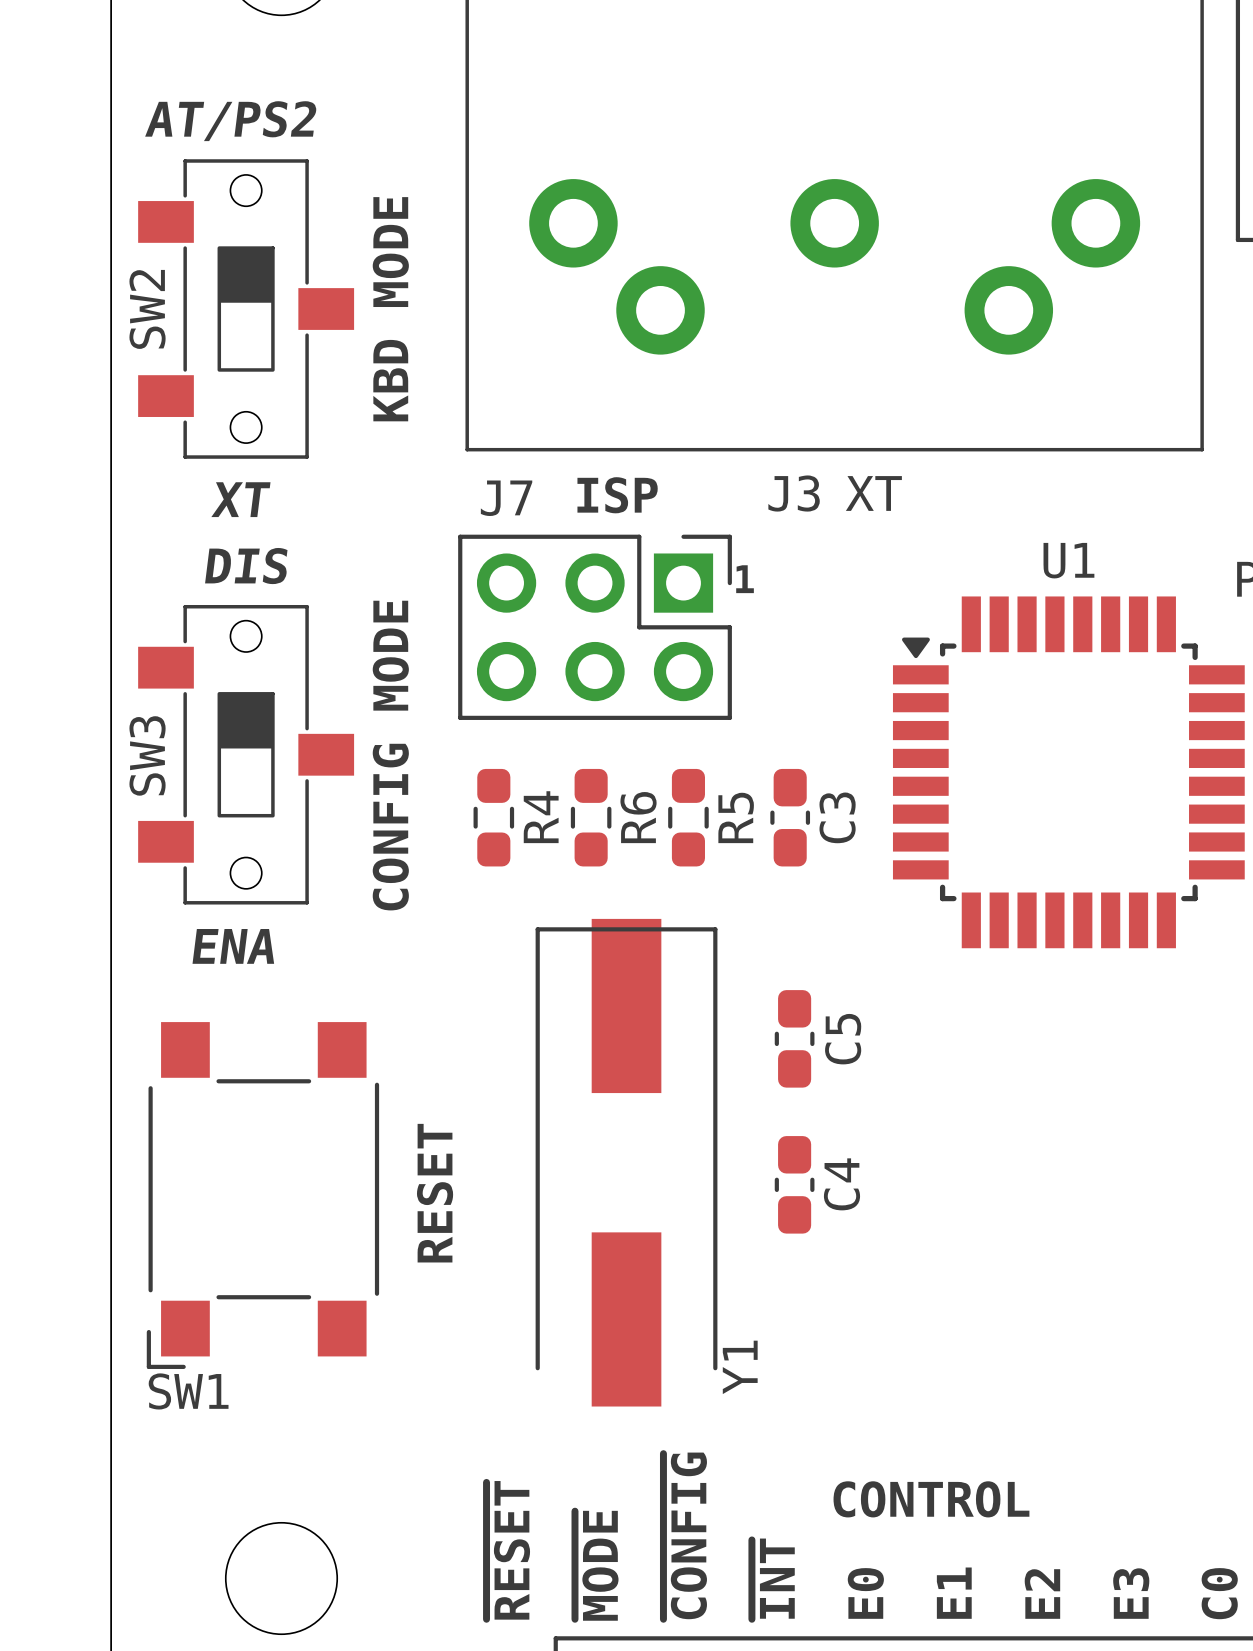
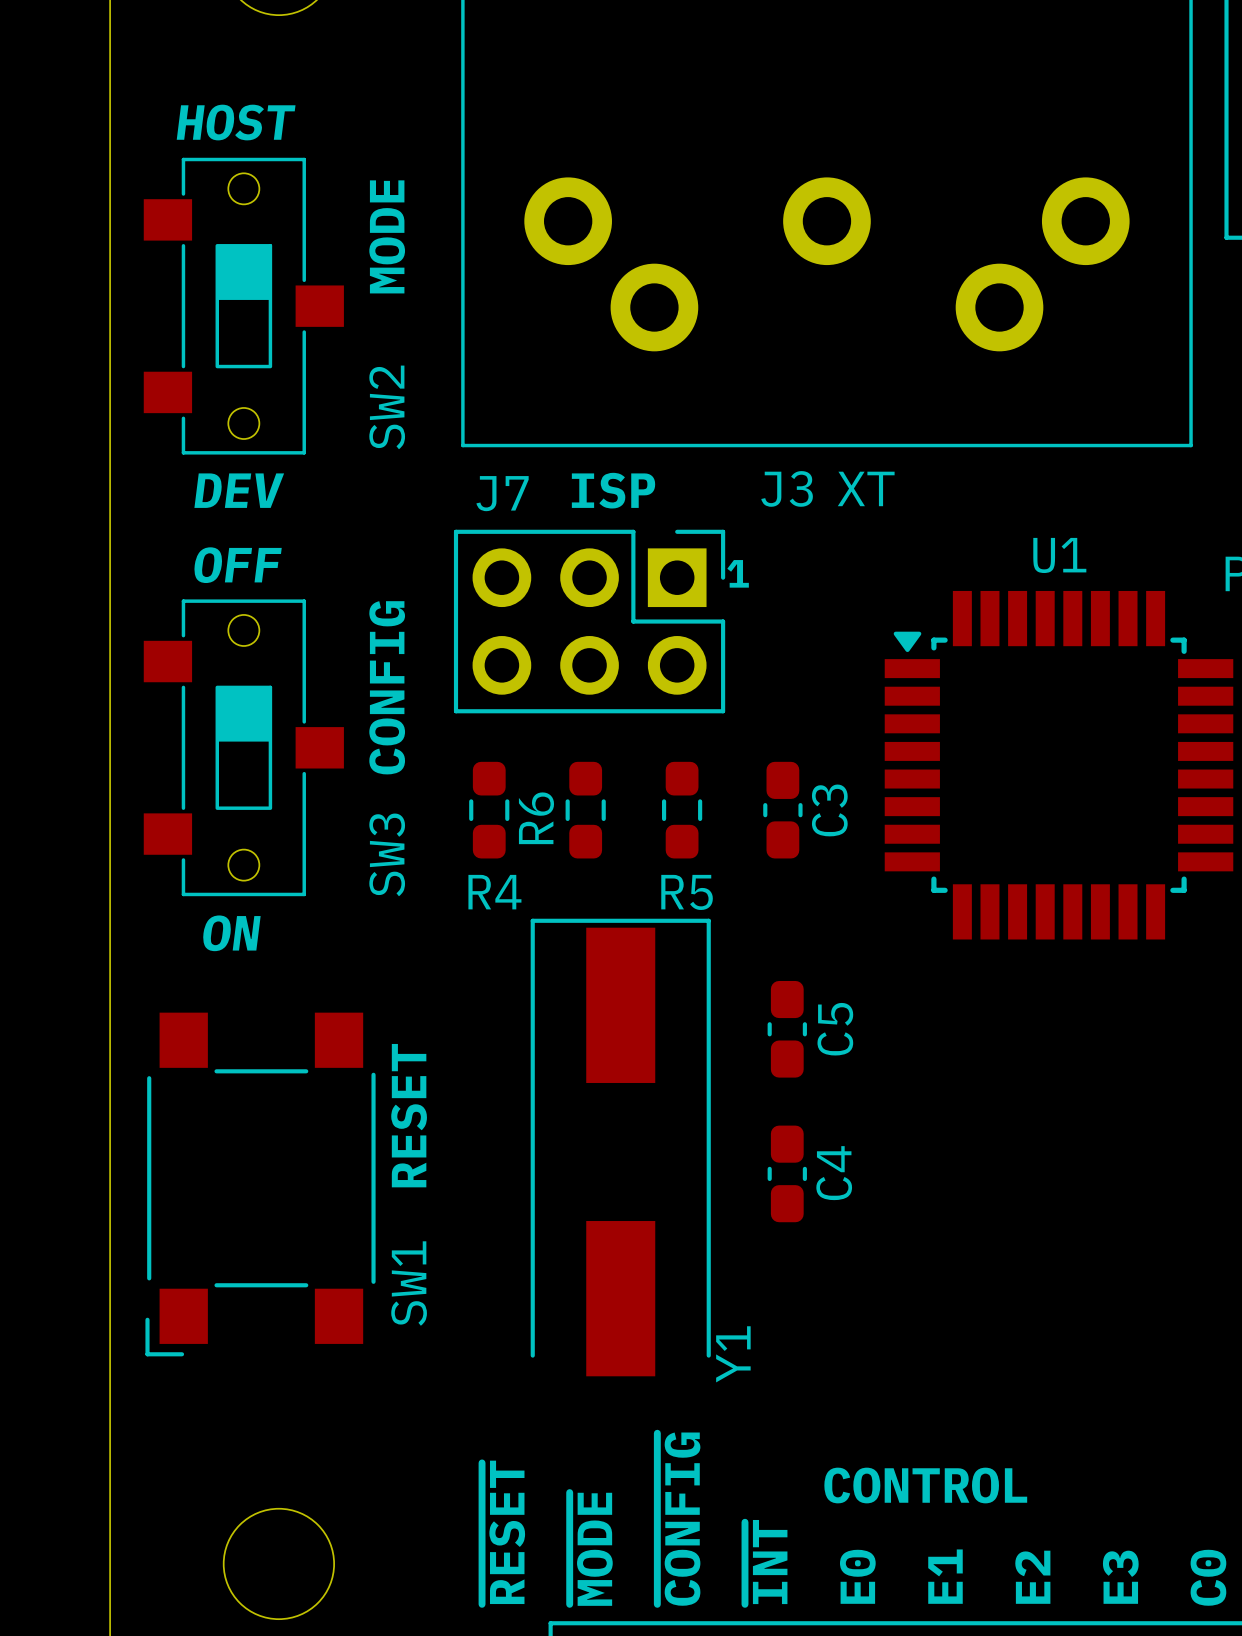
text: AT/PS2 (230, 121) -> HOST (236, 122)
SW2 footprint: [138, 159, 355, 459] -> [143, 157, 344, 455]
SW2 name position: SW2 (147, 309) -> SW2 (387, 407)
SW2 value: KBD MODE (390, 309) -> MODE (387, 236)
text: XT (240, 499) -> DEV (239, 490)
text: DIS (246, 566) -> OFF (237, 565)
SW3 footprint: [138, 604, 355, 905] -> [143, 599, 344, 897]
SW3 name position: SW3 (147, 755) -> SW3 (387, 854)
SW3 value: CONFIG MODE (390, 755) -> CONFIG (387, 687)
R4 name rotation: 0° (541, 817) -> 90° clockwise (494, 892)
R4 name position: R4 (541, 817) -> R4 (494, 892)
R6 name position: R6 (638, 817) -> R6 (536, 818)
R5 name rotation: 0° (736, 817) -> 90° clockwise (687, 892)
R5 name position: R5 (736, 817) -> R5 (687, 892)
Y1 footprint: [535, 918, 718, 1407] -> [530, 918, 711, 1377]
text: ENA (233, 946) -> ON (231, 933)
SW1 value position: RESET (435, 1193) -> RESET (409, 1115)
SW1 name rotation: 0° (188, 1391) -> 90° counterclockwise (409, 1283)
SW1 name position: SW1 (188, 1391) -> SW1 (409, 1283)

